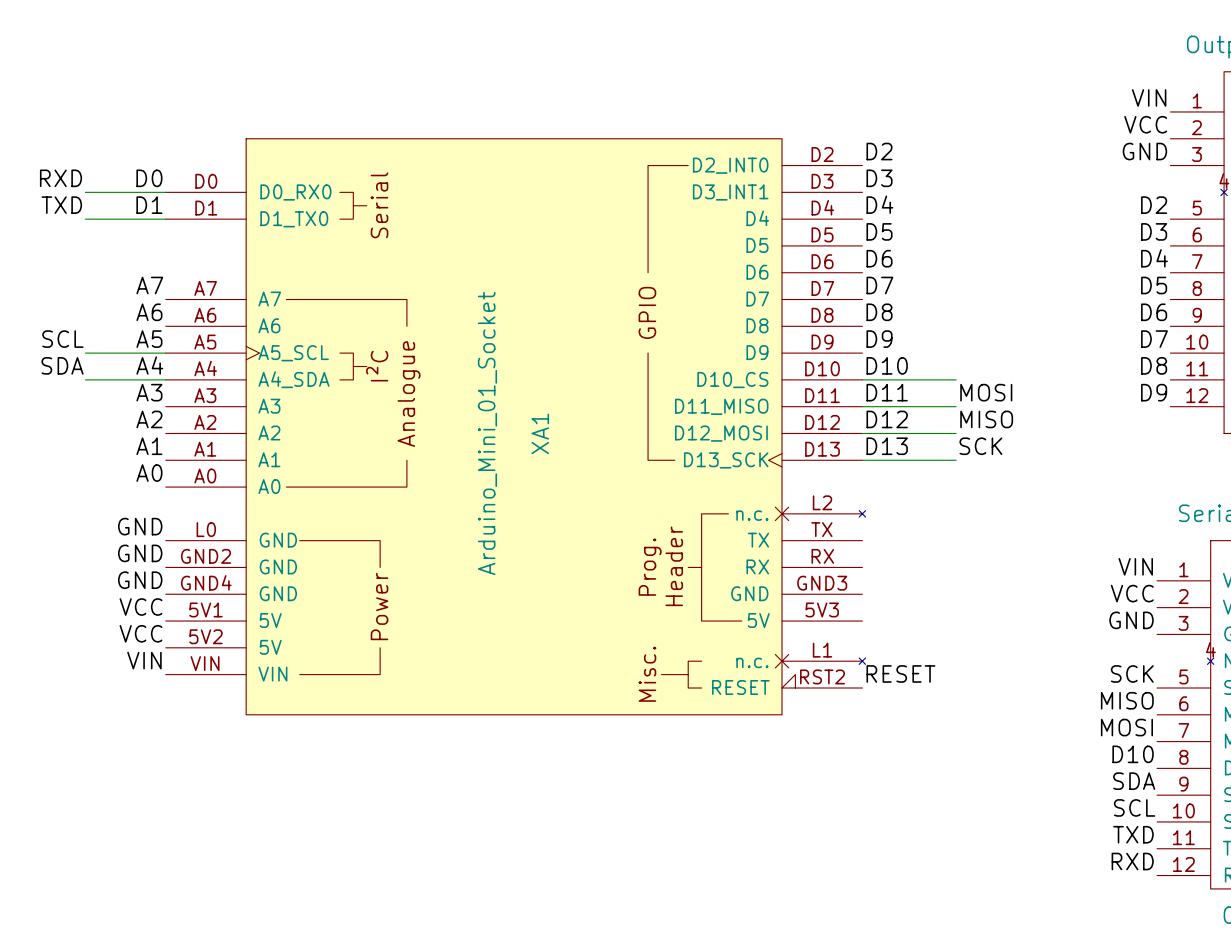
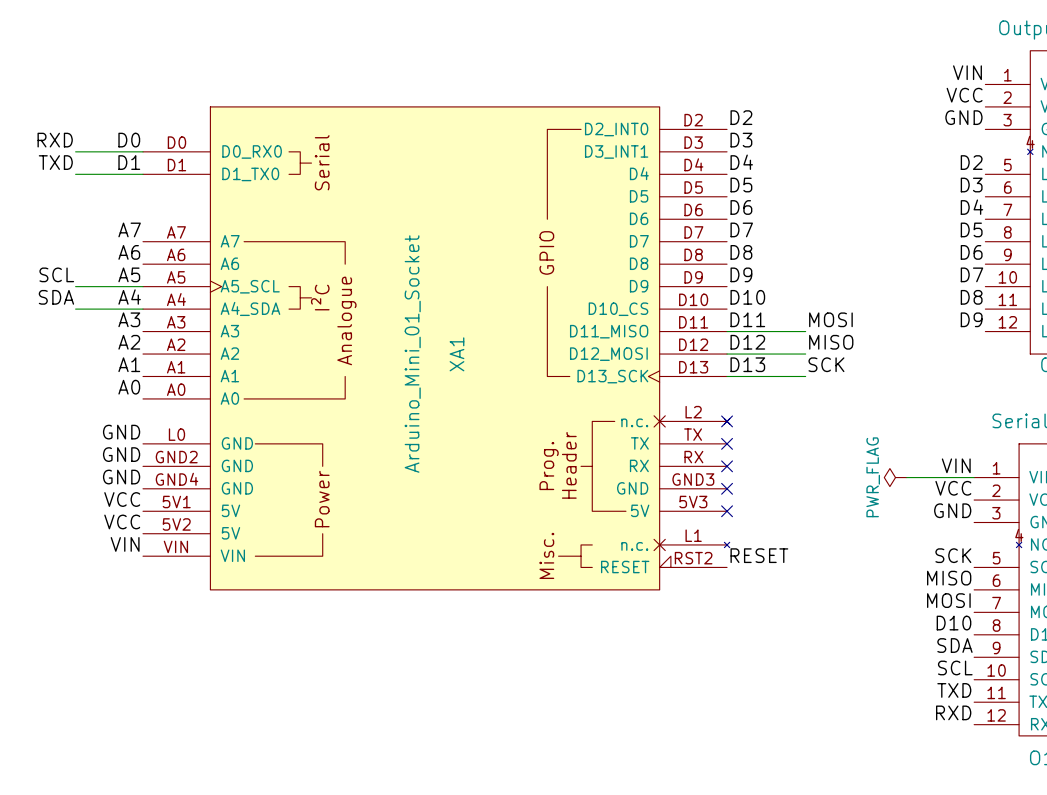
wire: (862, 379) (956, 379) -> none
no-connect mark: none -> (727, 421)
no-connect mark: none -> (727, 443)
no-connect mark: none -> (727, 466)
power symbol: none -> PWR_FLAG (895, 477)
wire: none -> (906, 477) (974, 477)
no-connect mark: none -> (727, 488)
no-connect mark: none -> (727, 511)

